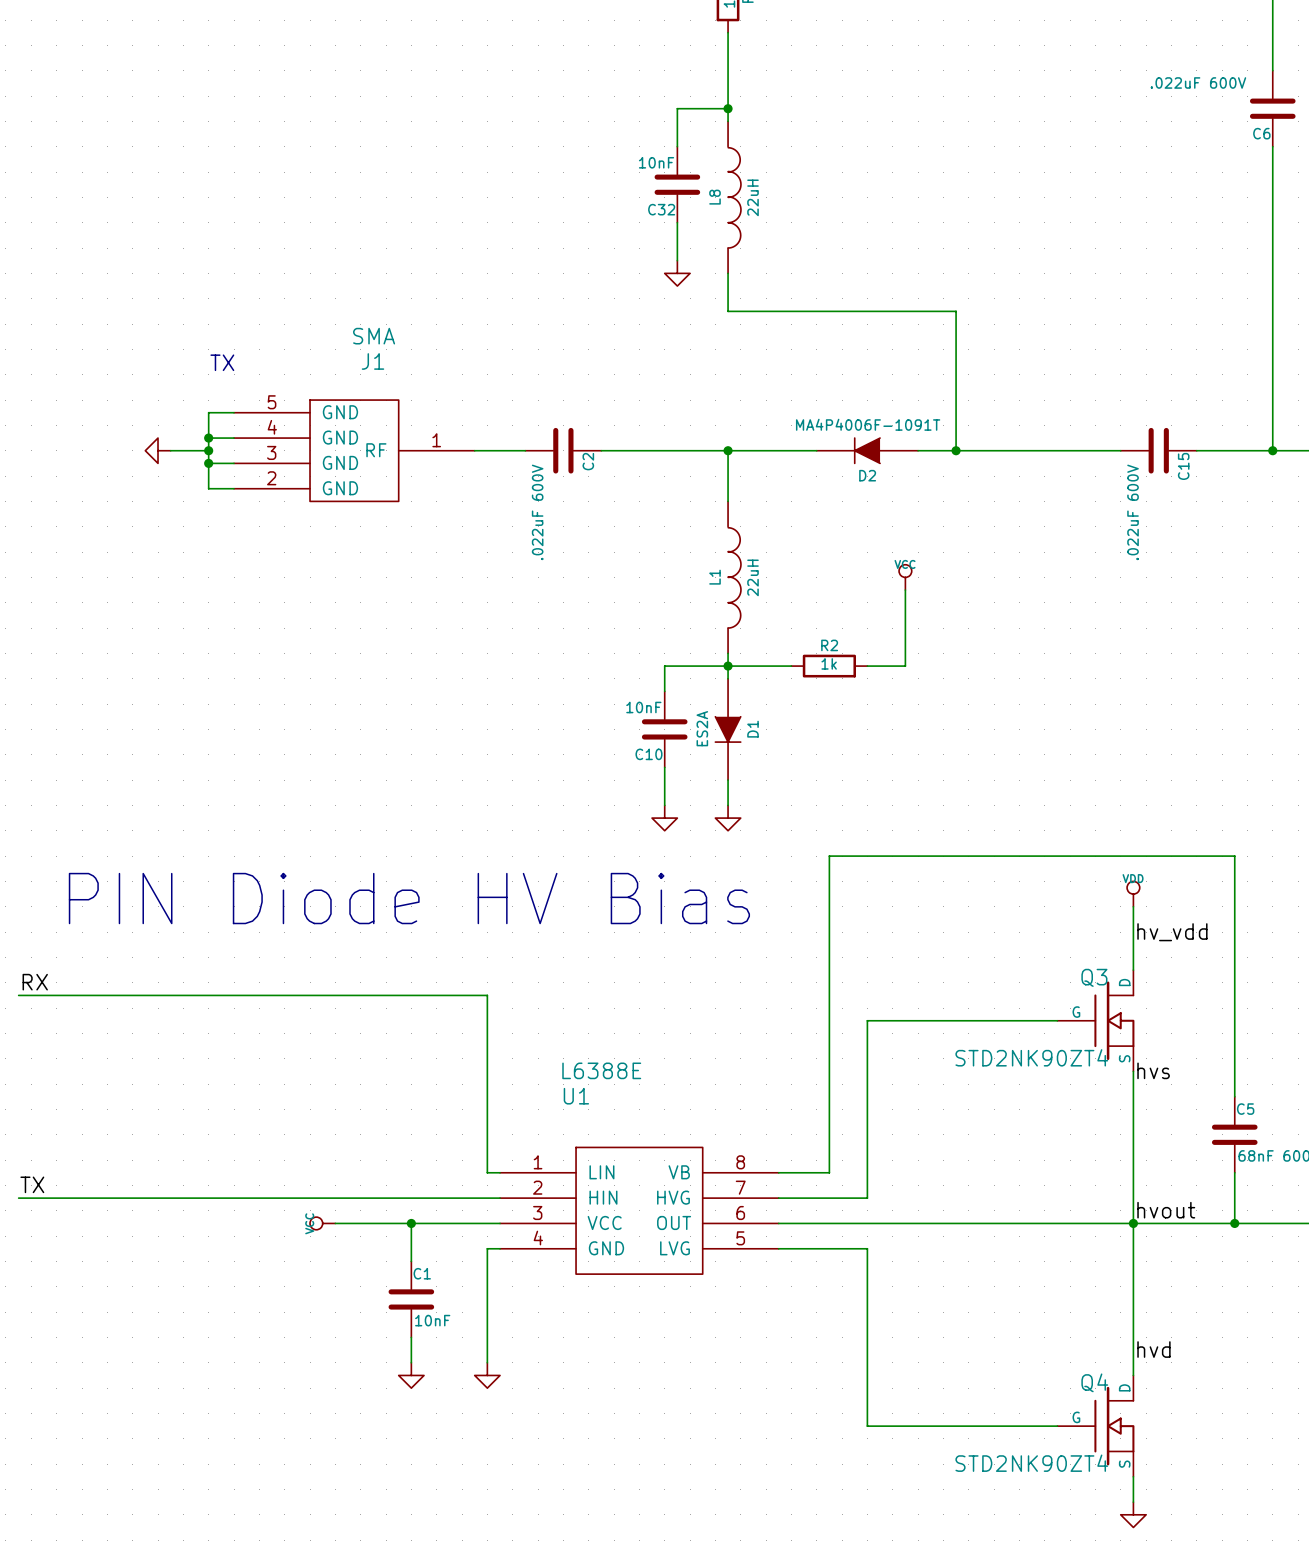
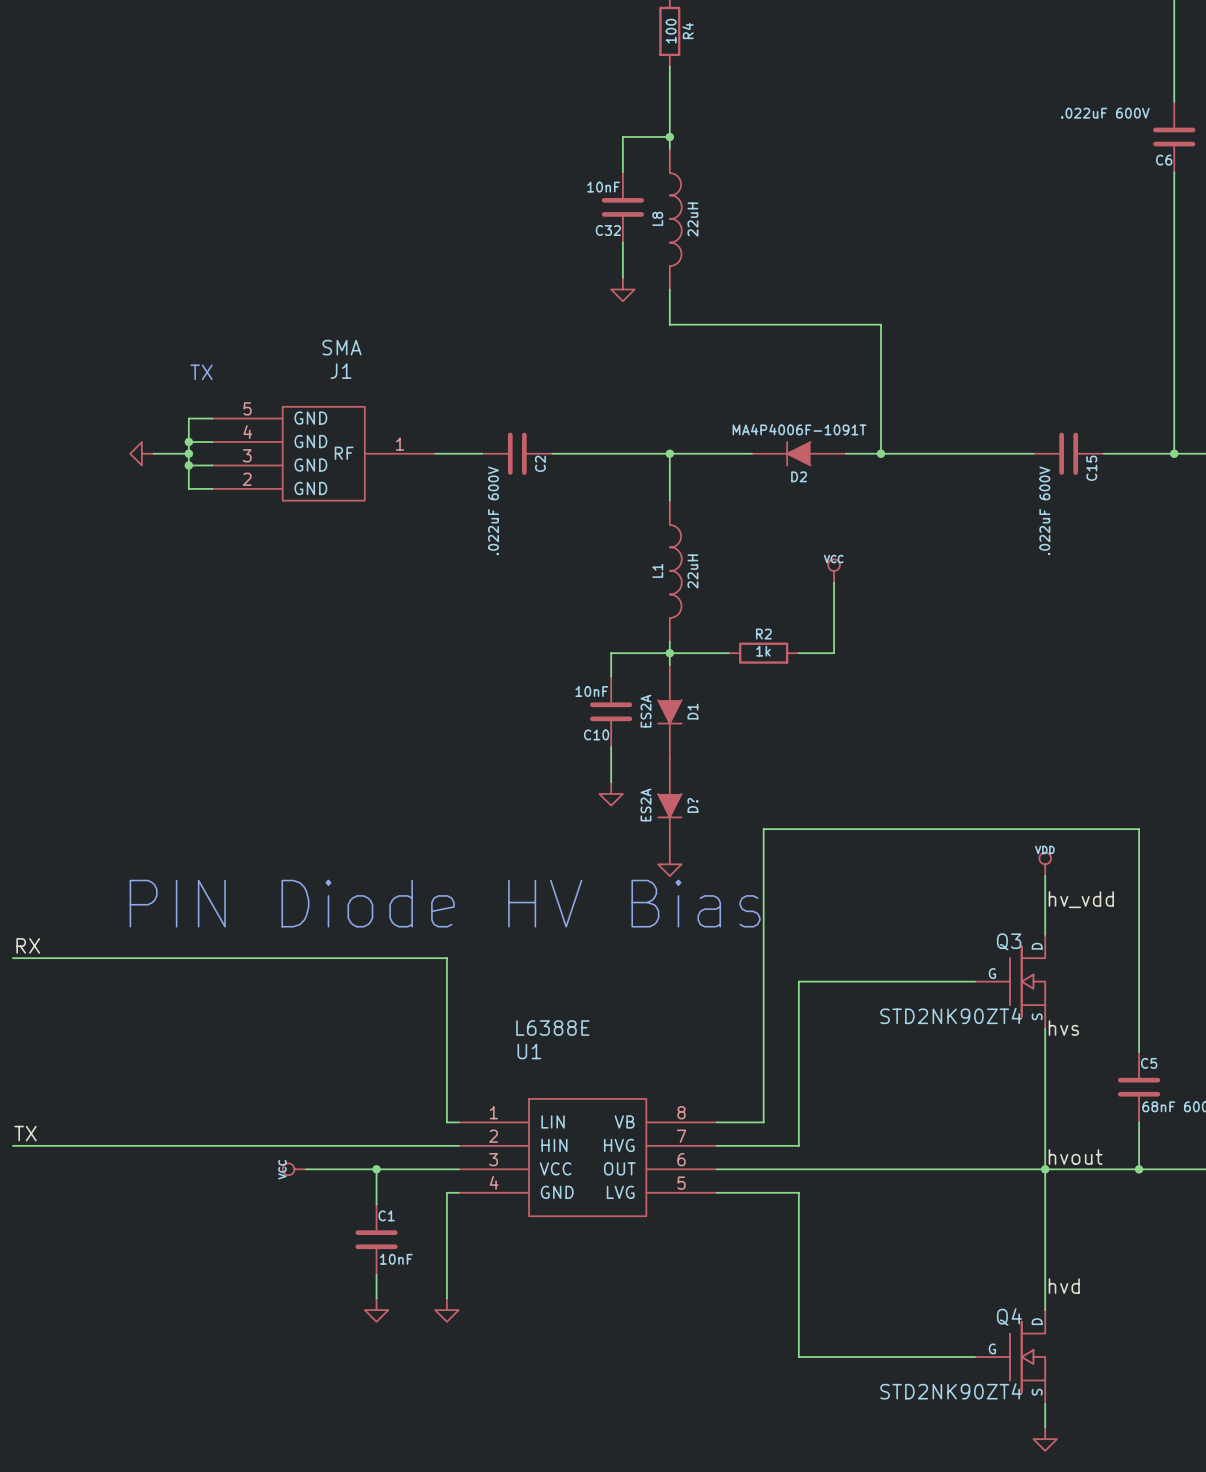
power symbol position: (728, 818) -> (669, 864)
D?: none -> ES2A (669, 805)
text position: PIN Diode HV Bias (409, 898) -> PIN Diode HV Bias (445, 903)

